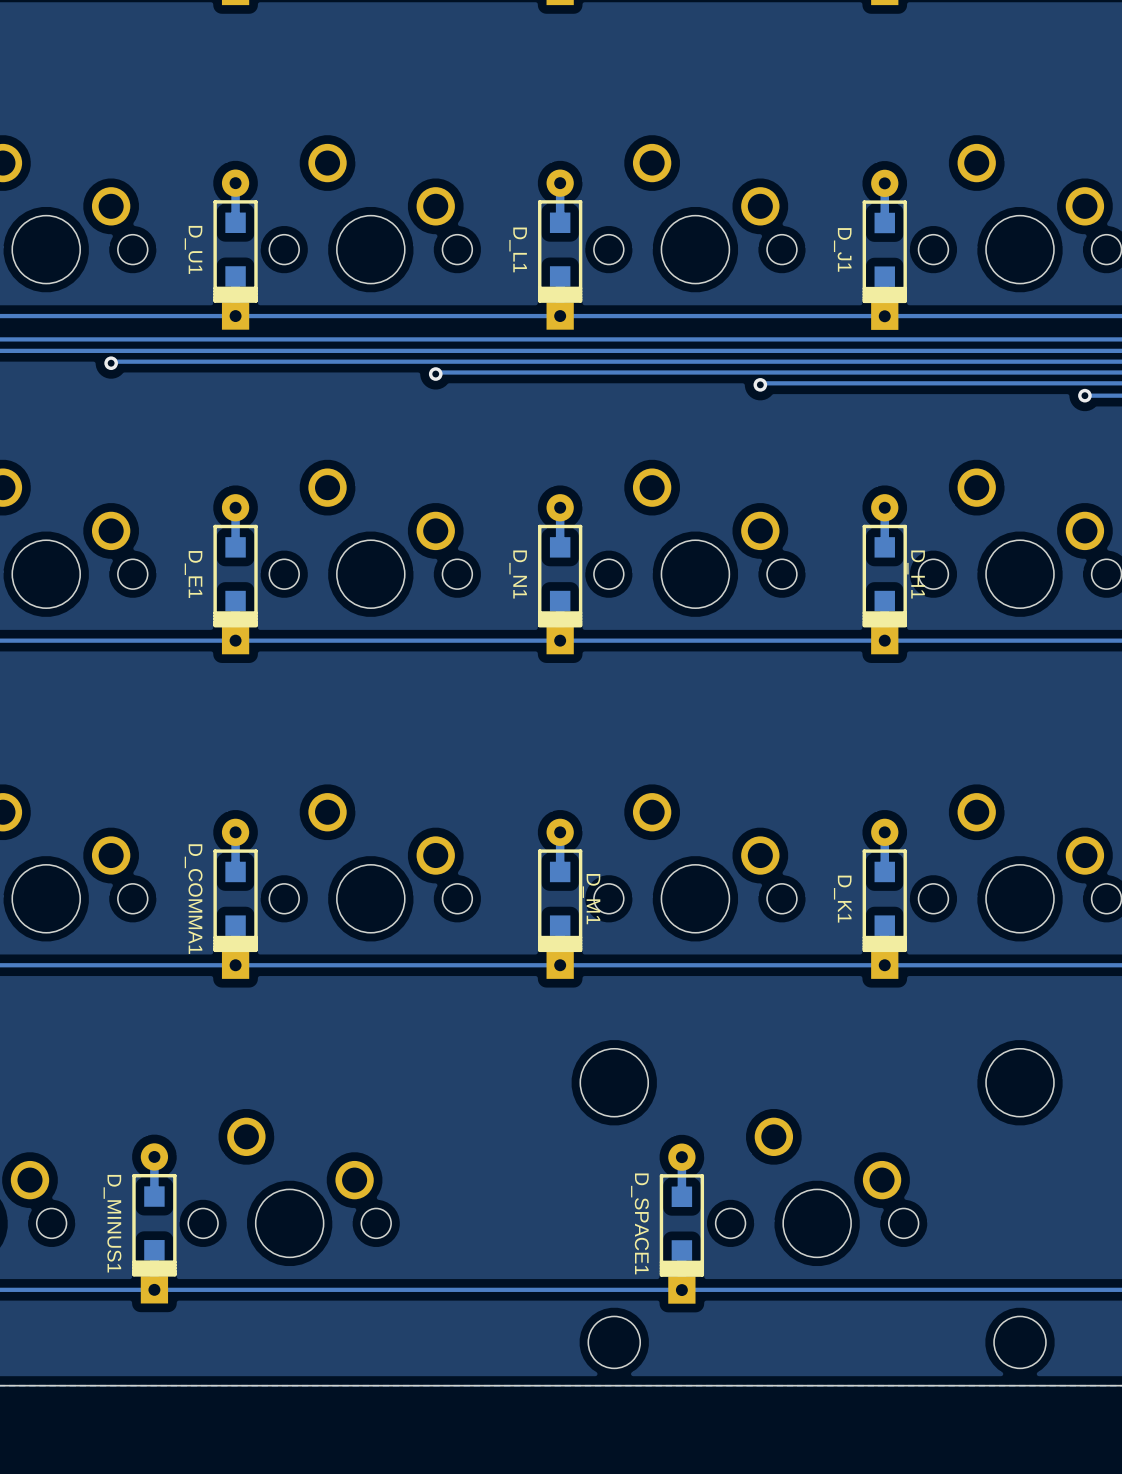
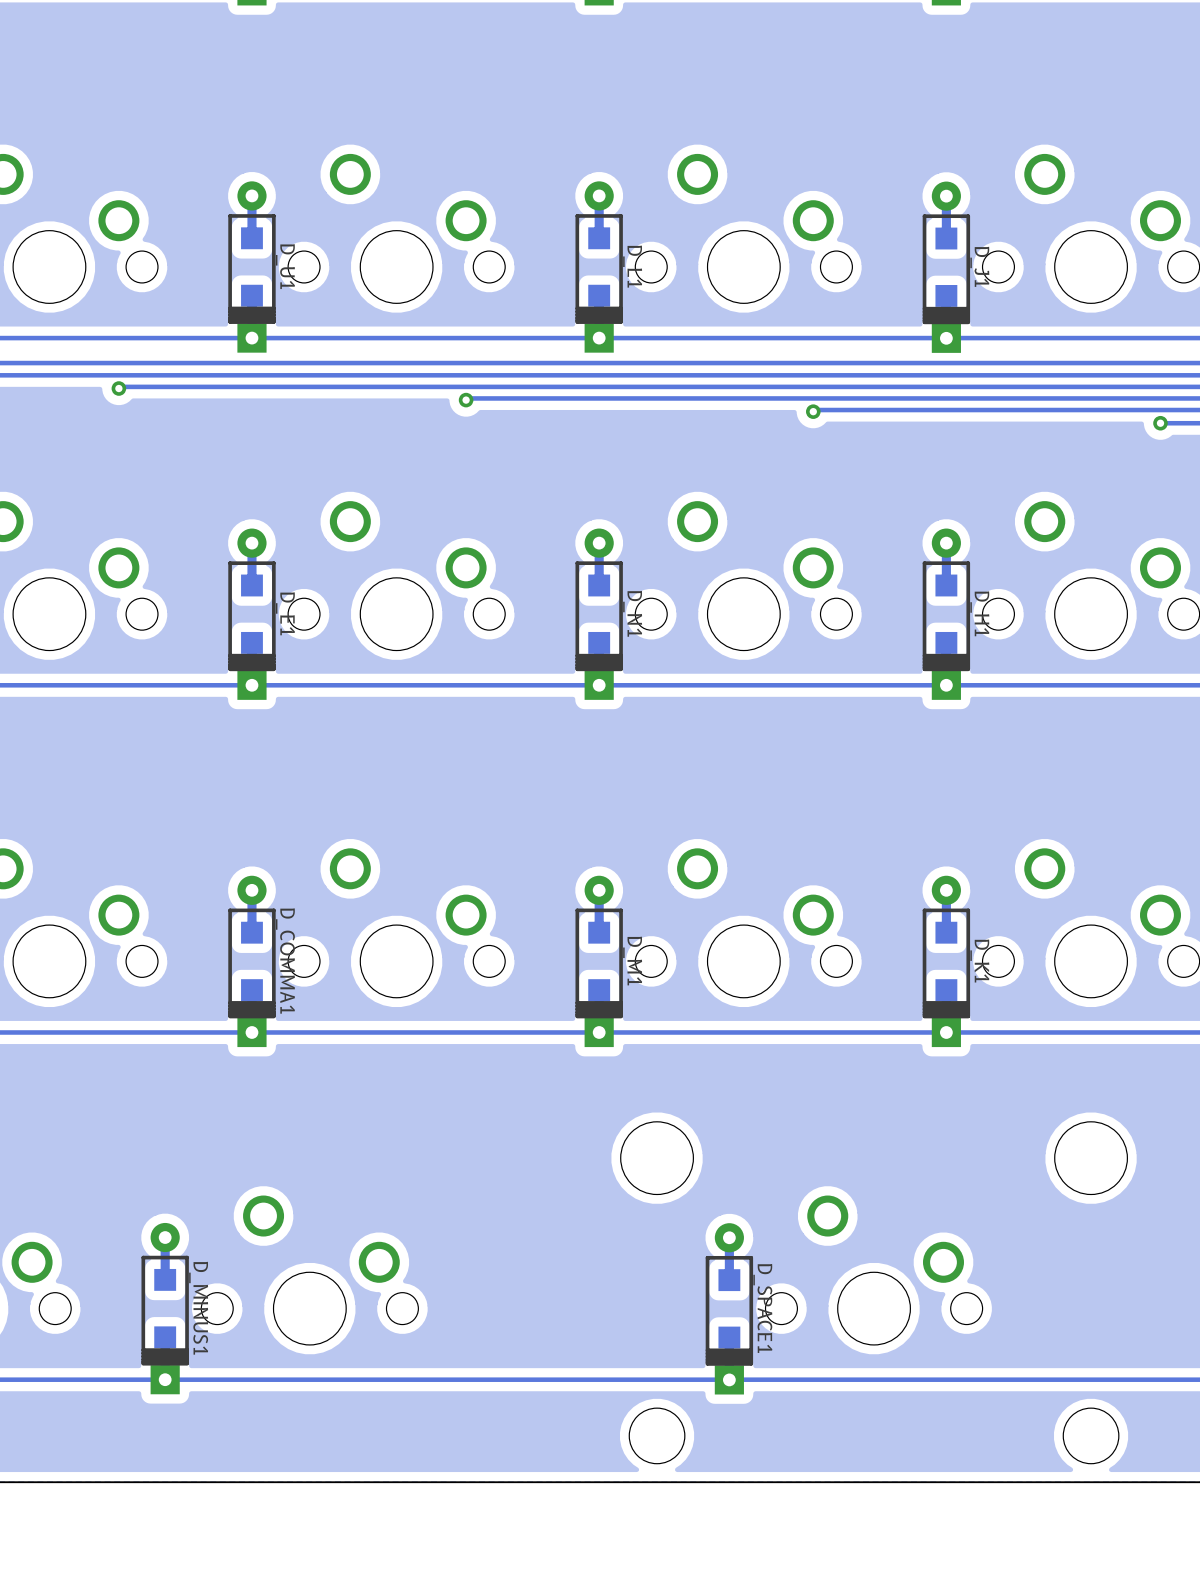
D_U1 name position: D_U1 (193, 249) -> D_U1 (285, 266)
D_L1 name position: D_L1 (518, 249) -> D_L1 (632, 266)
D_J1 name position: D_J1 (842, 249) -> D_J1 (979, 266)
D_E1 name position: D_E1 (193, 574) -> D_E1 (285, 613)
D_N1 name position: D_N1 (518, 574) -> D_N1 (632, 613)
D_COMMA1 name position: D_COMMA1 (193, 899) -> D_COMMA1 (285, 961)
D_K1 name position: D_K1 (842, 899) -> D_K1 (979, 961)
D_MINUS1 name position: D_MINUS1 (112, 1223) -> D_MINUS1 (198, 1308)
D_SPACE1 name position: D_SPACE1 (639, 1223) -> D_SPACE1 (762, 1308)

